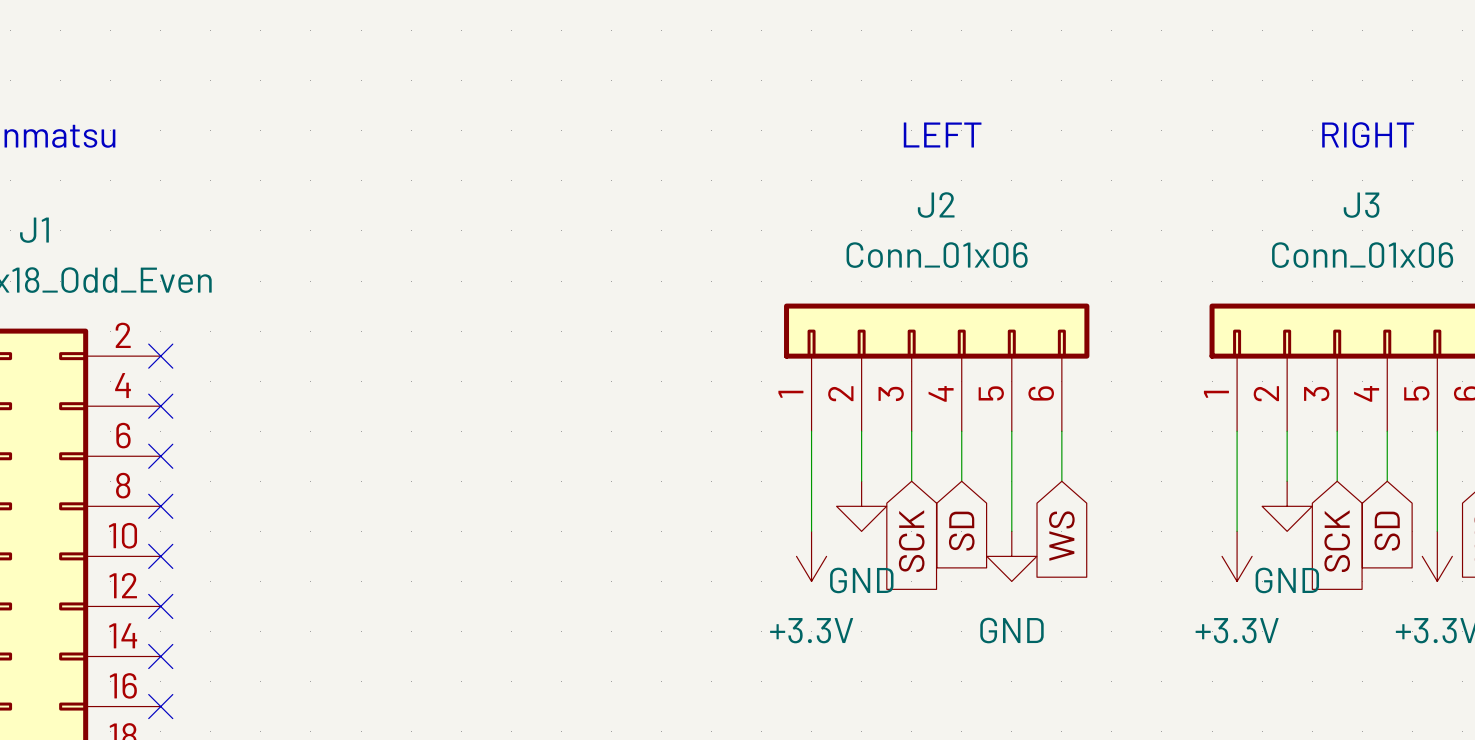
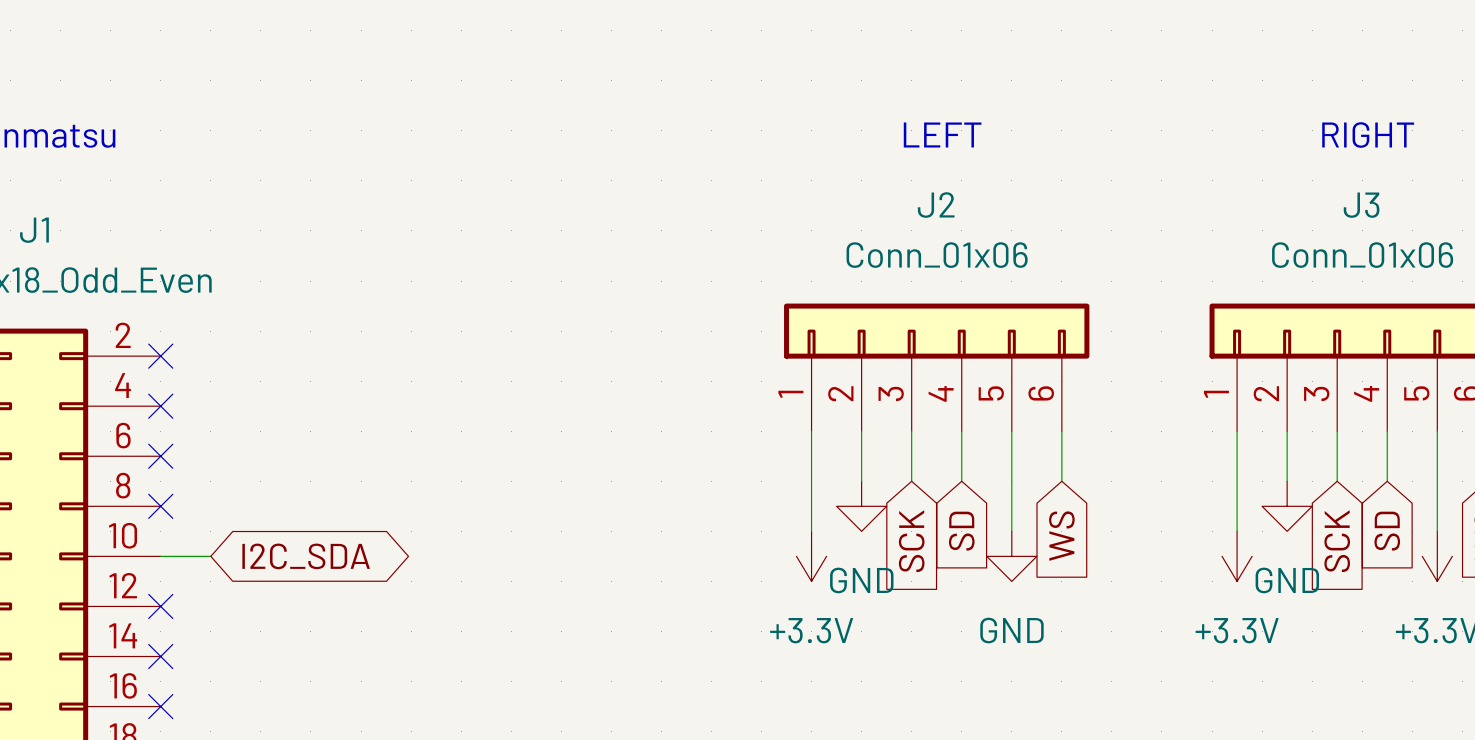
wire: none -> (160, 556) (210, 556)
no-connect mark: (160, 556) -> none
global label: none -> I2C_SDA (306, 556)

